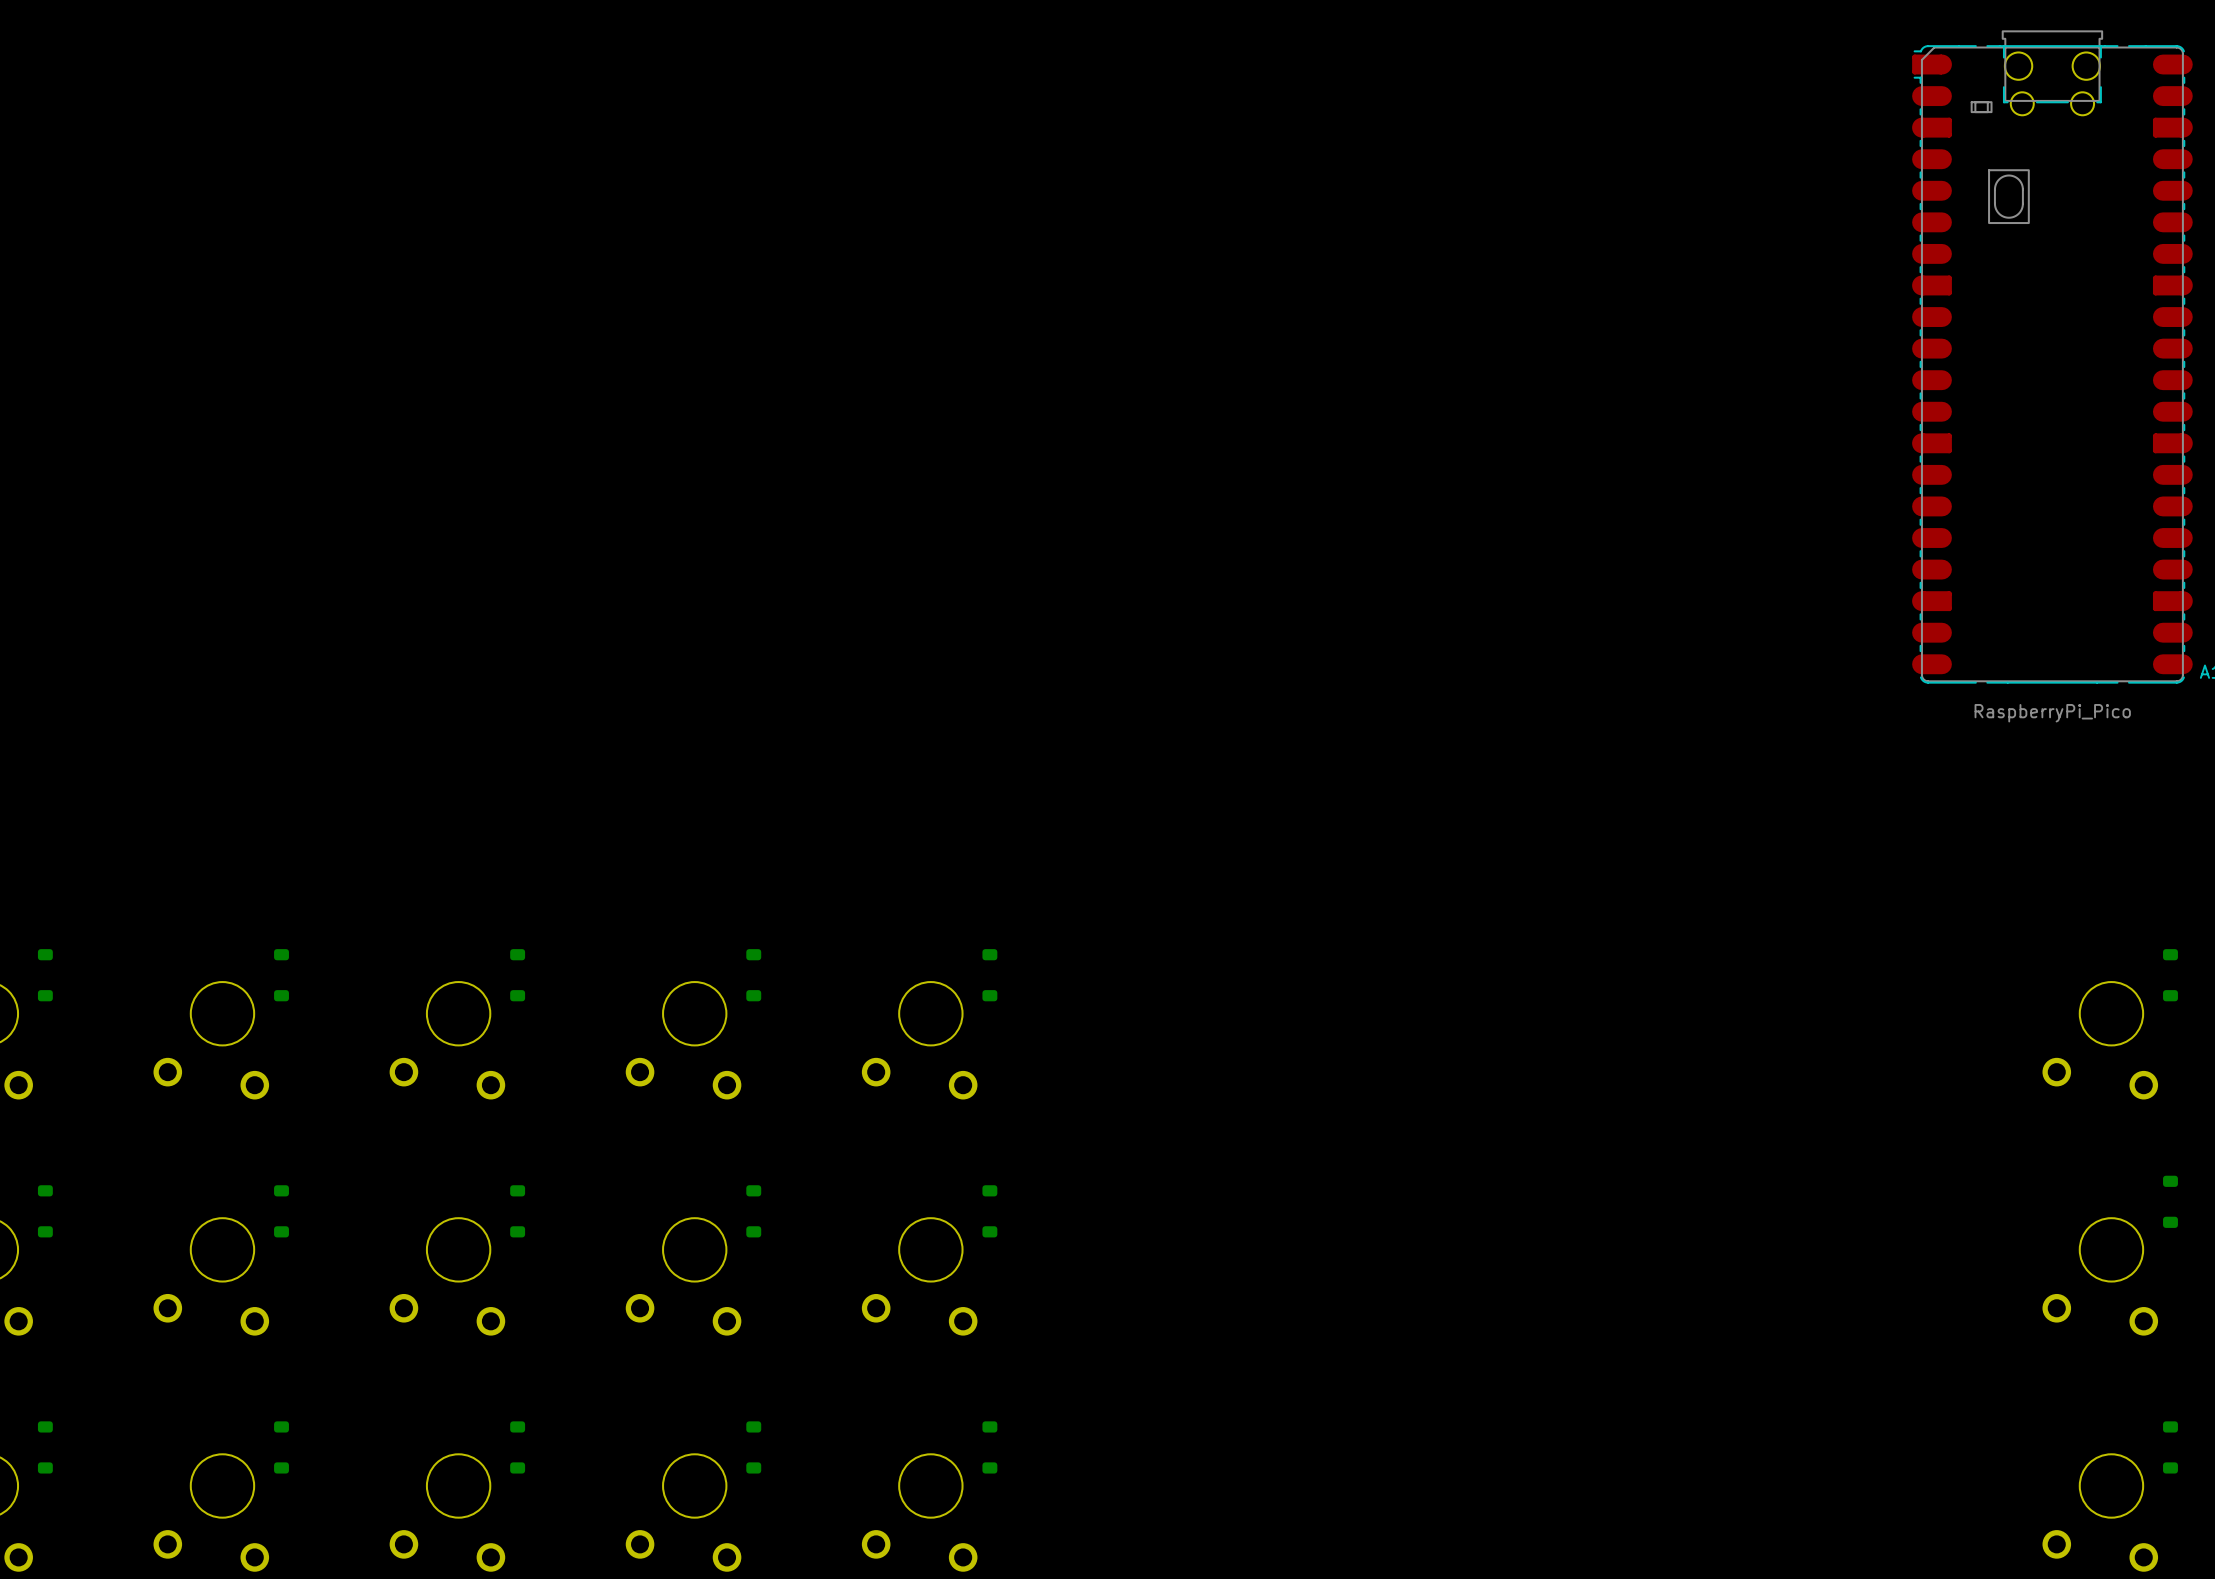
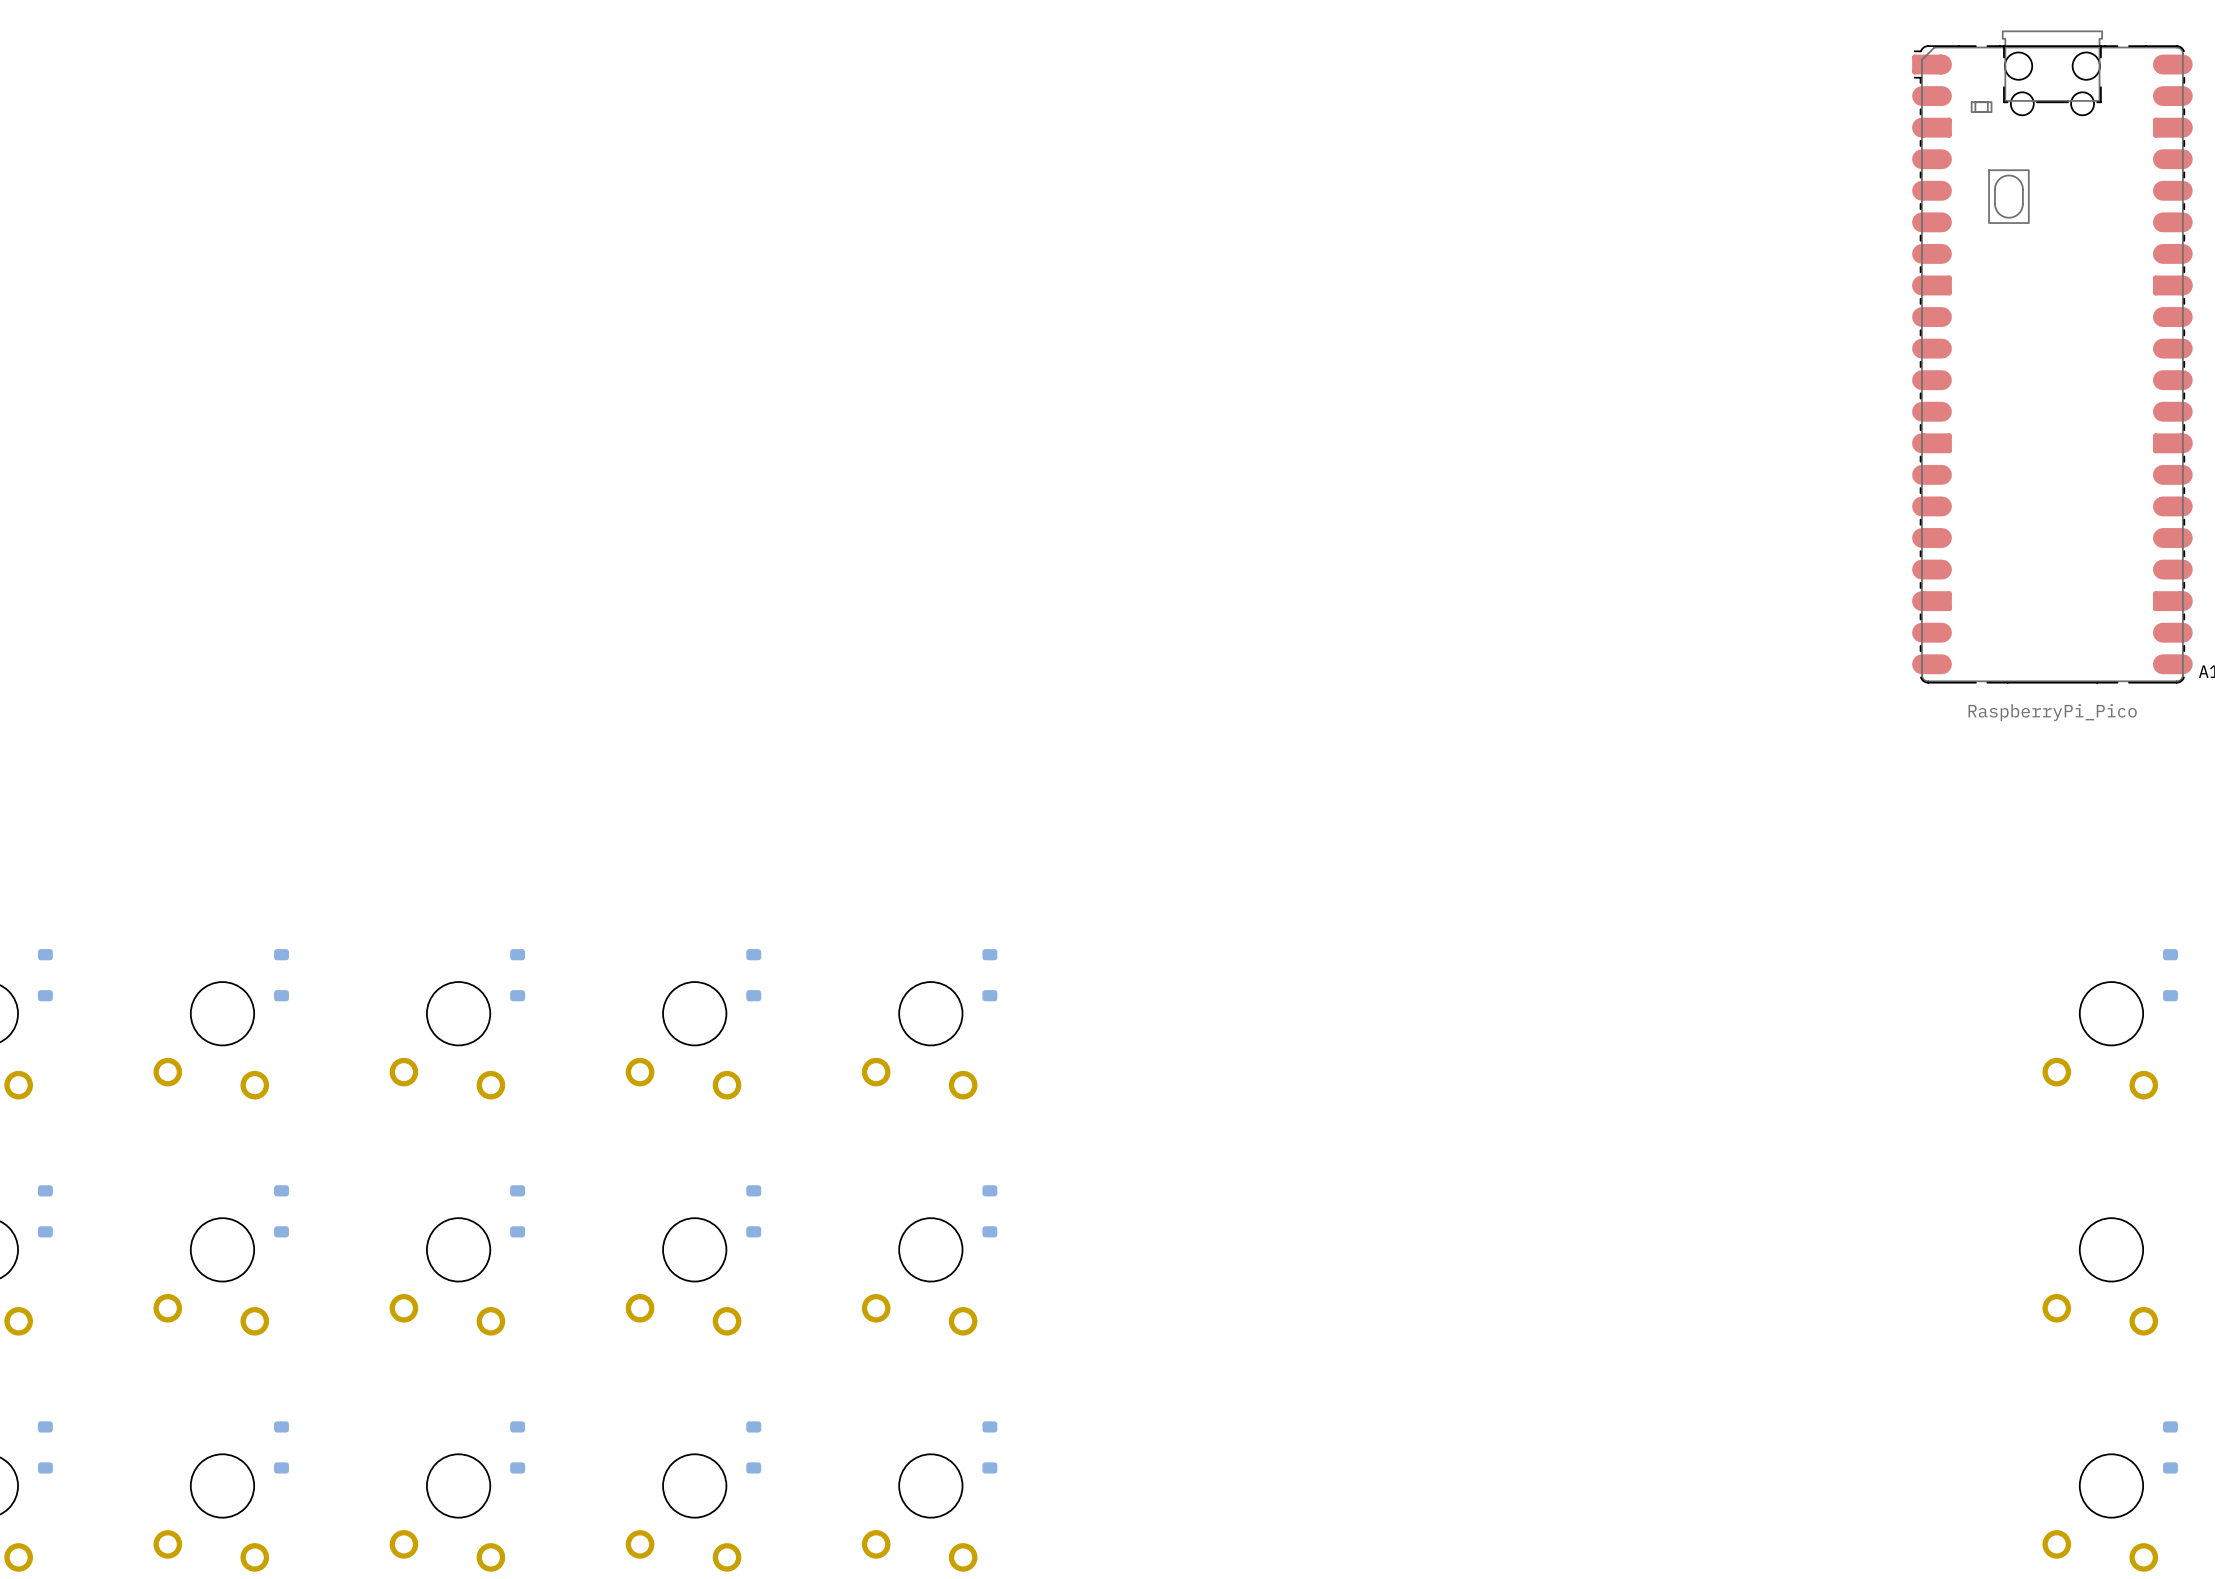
part: (2170, 1201) -> none

